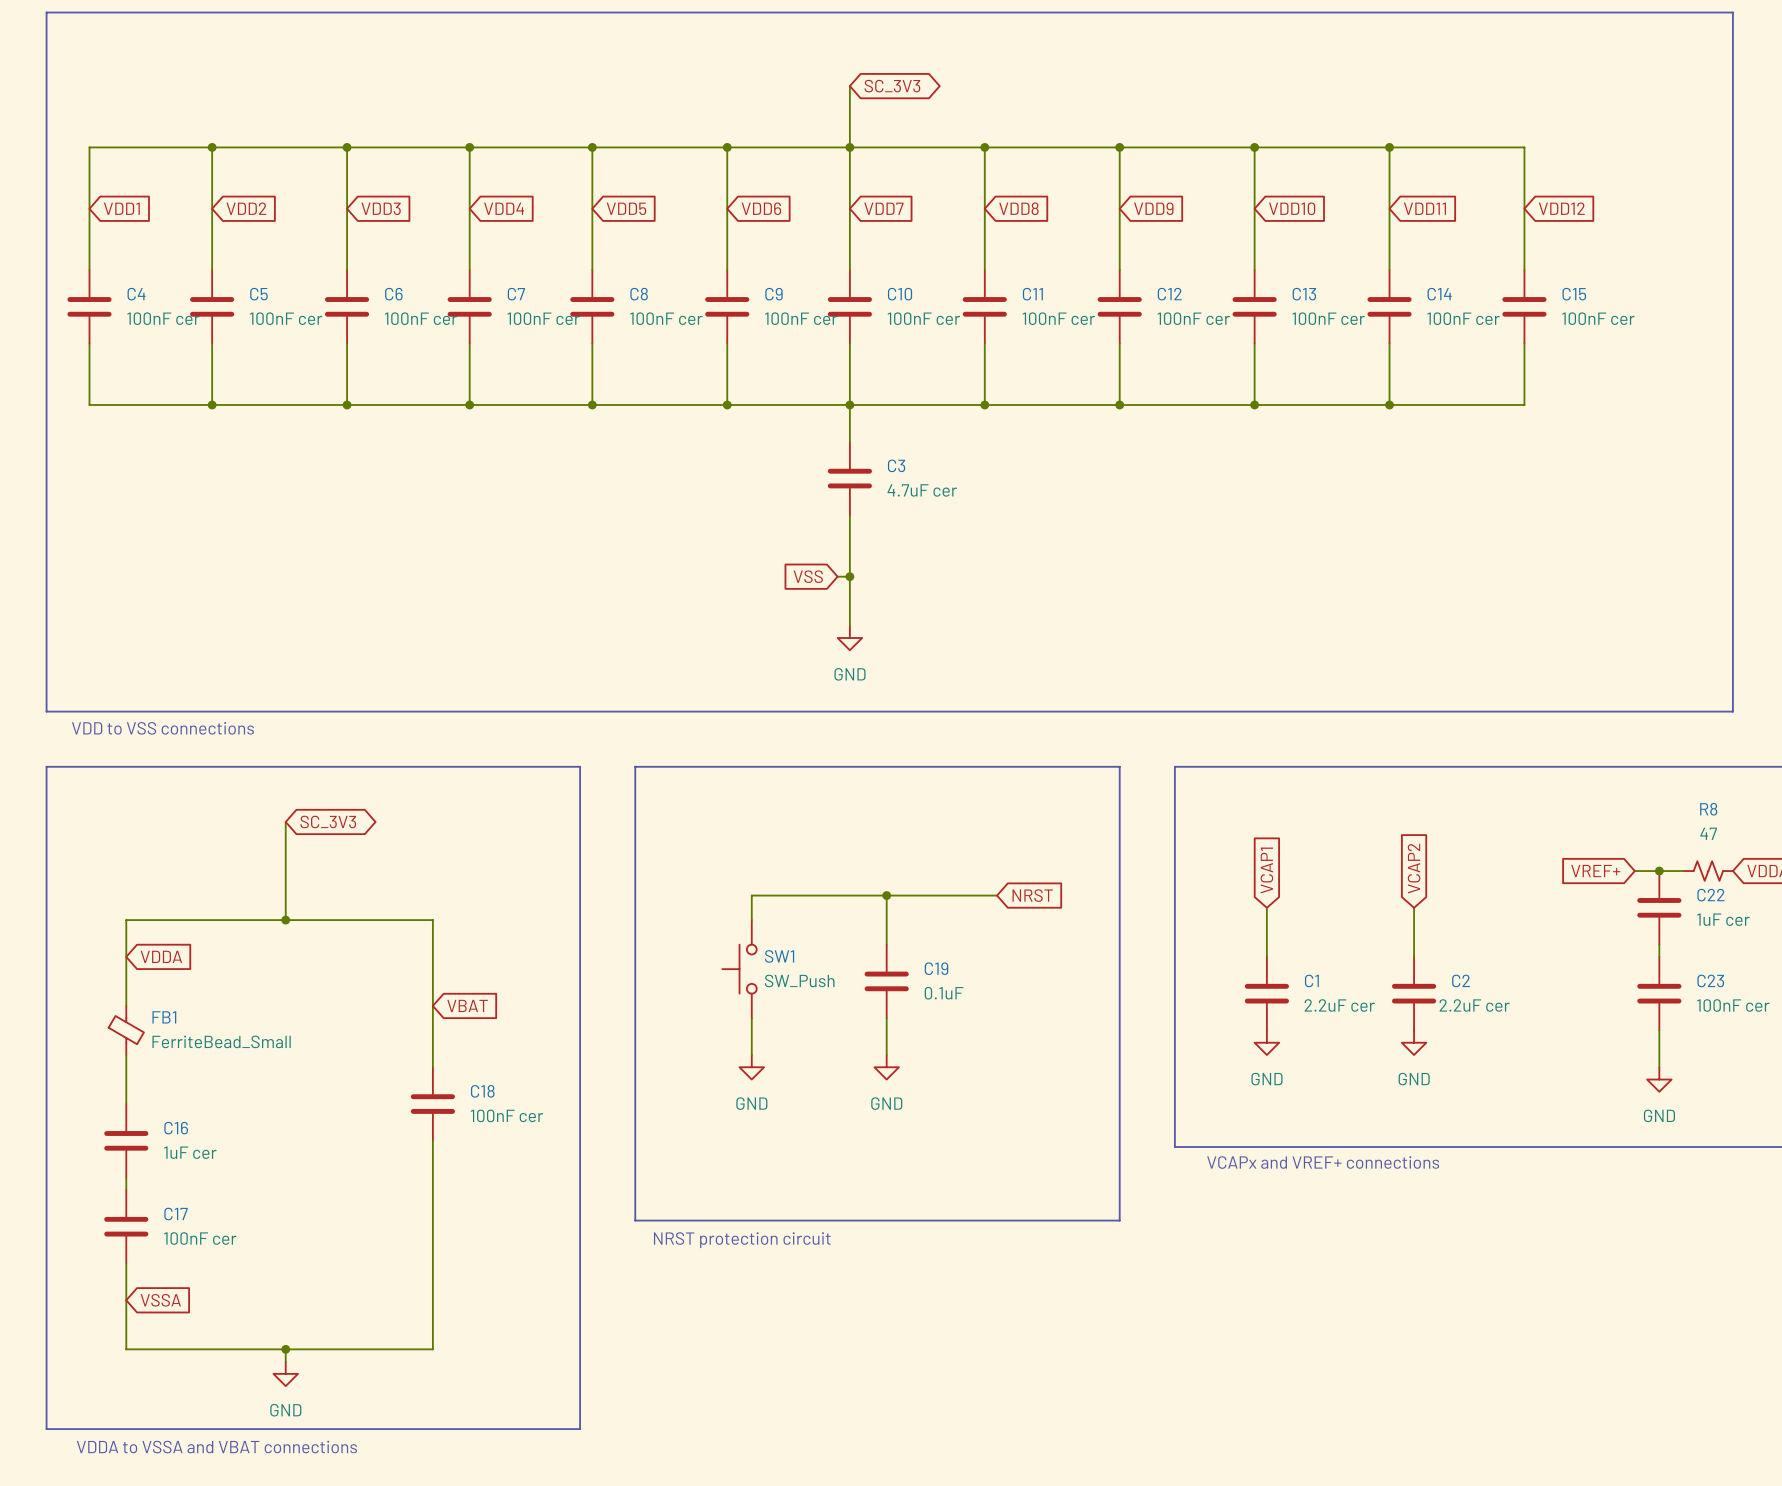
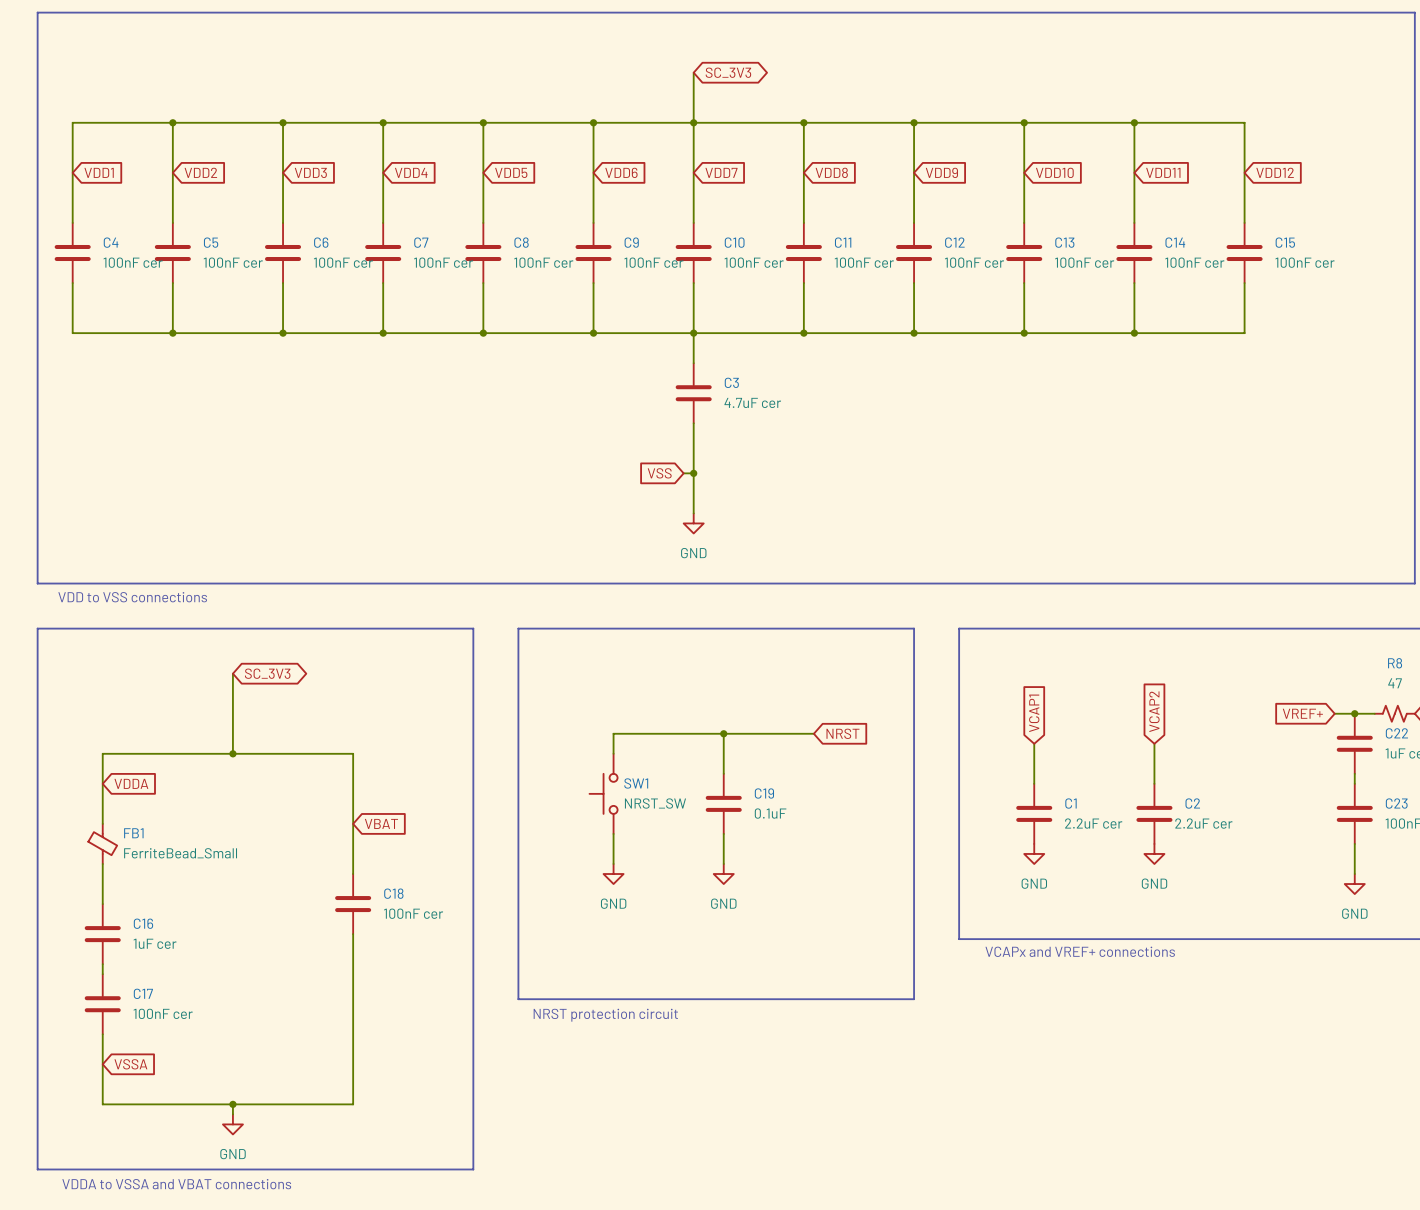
SW1 value: SW_Push (799, 980) -> NRST_SW (655, 803)

